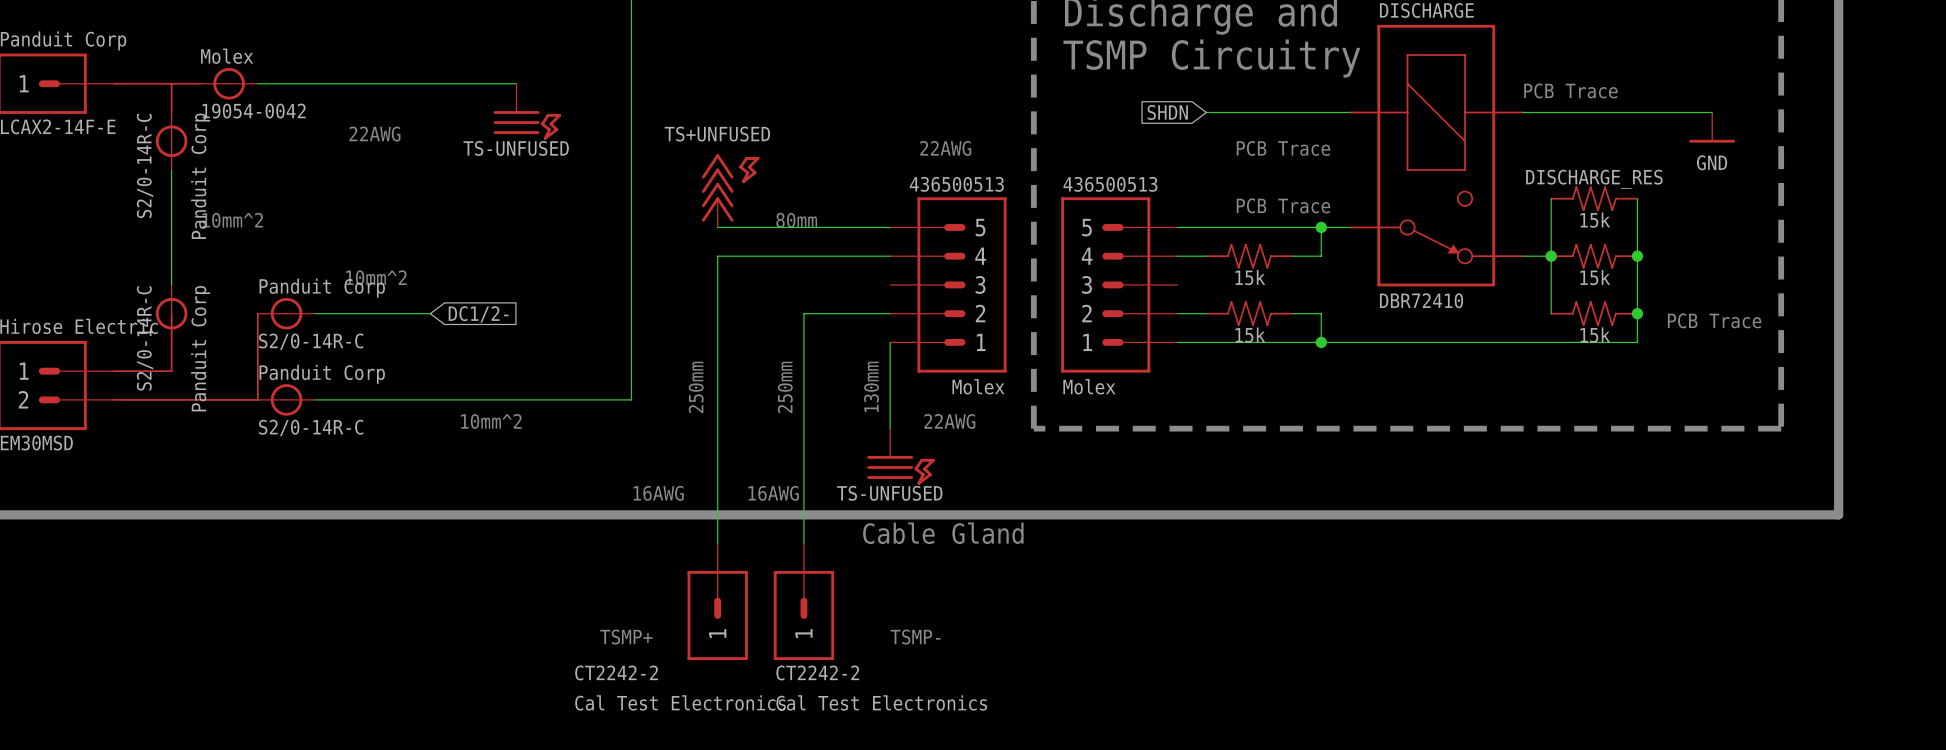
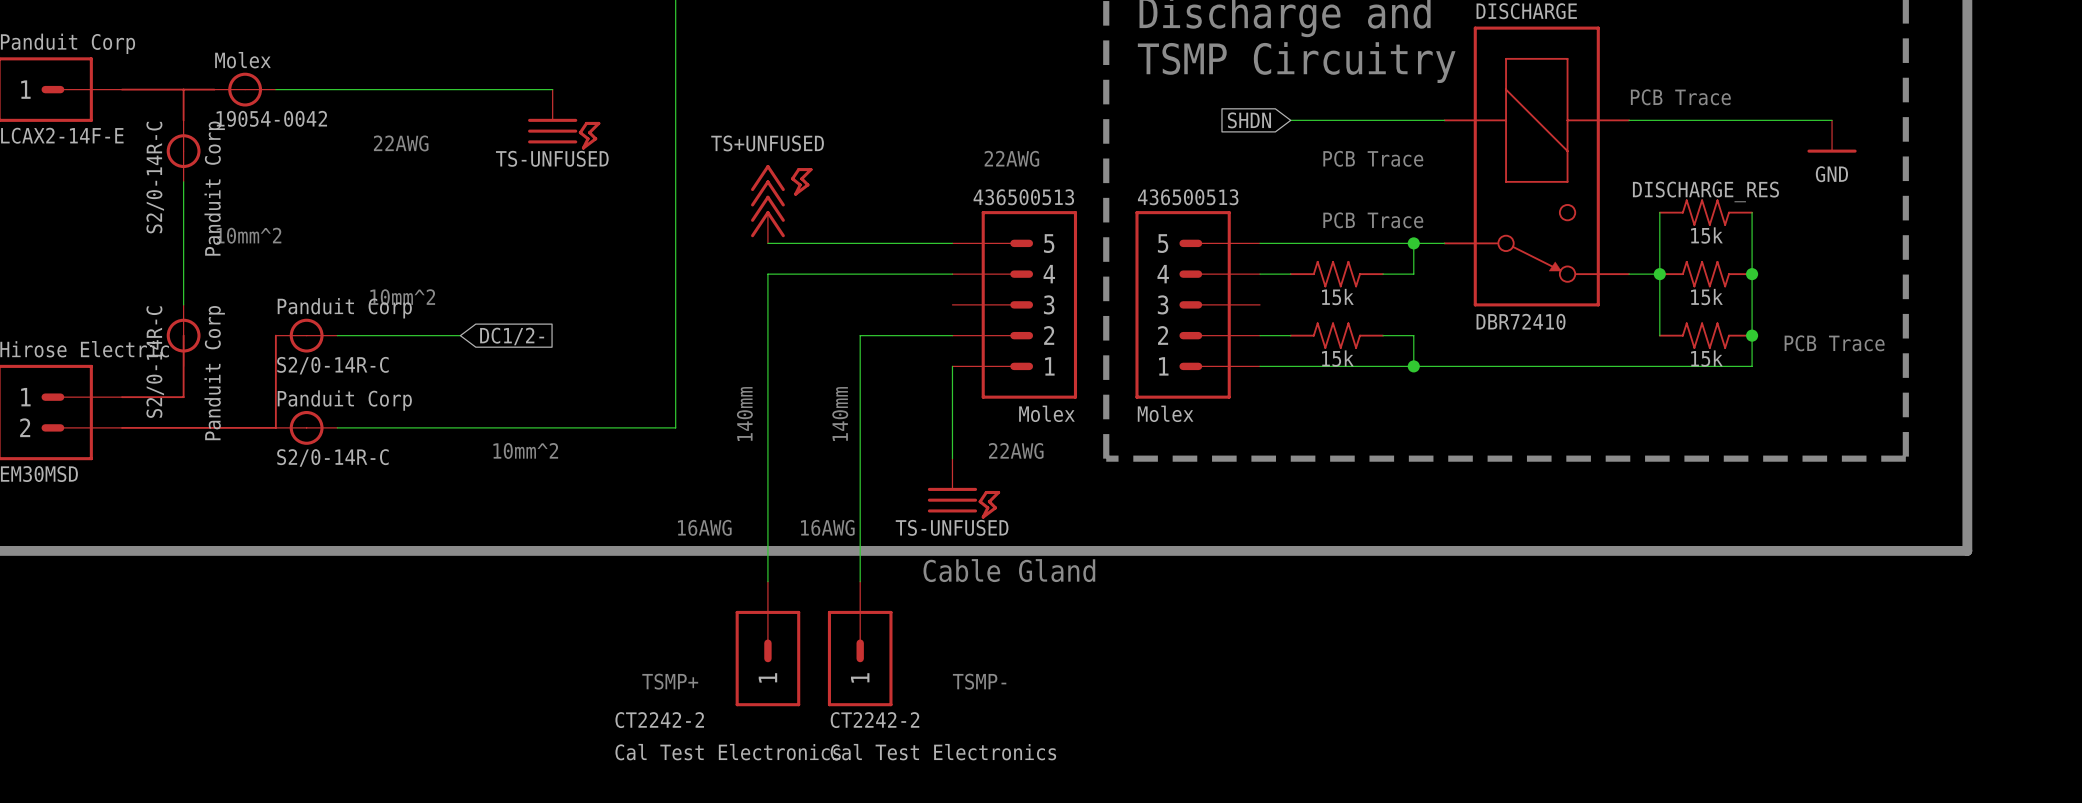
text: 80mm (796, 220) -> none
text: 130mm (871, 386) -> none
text: 250mm (696, 387) -> 140mm (744, 414)
text: 250mm (785, 387) -> 140mm (840, 414)

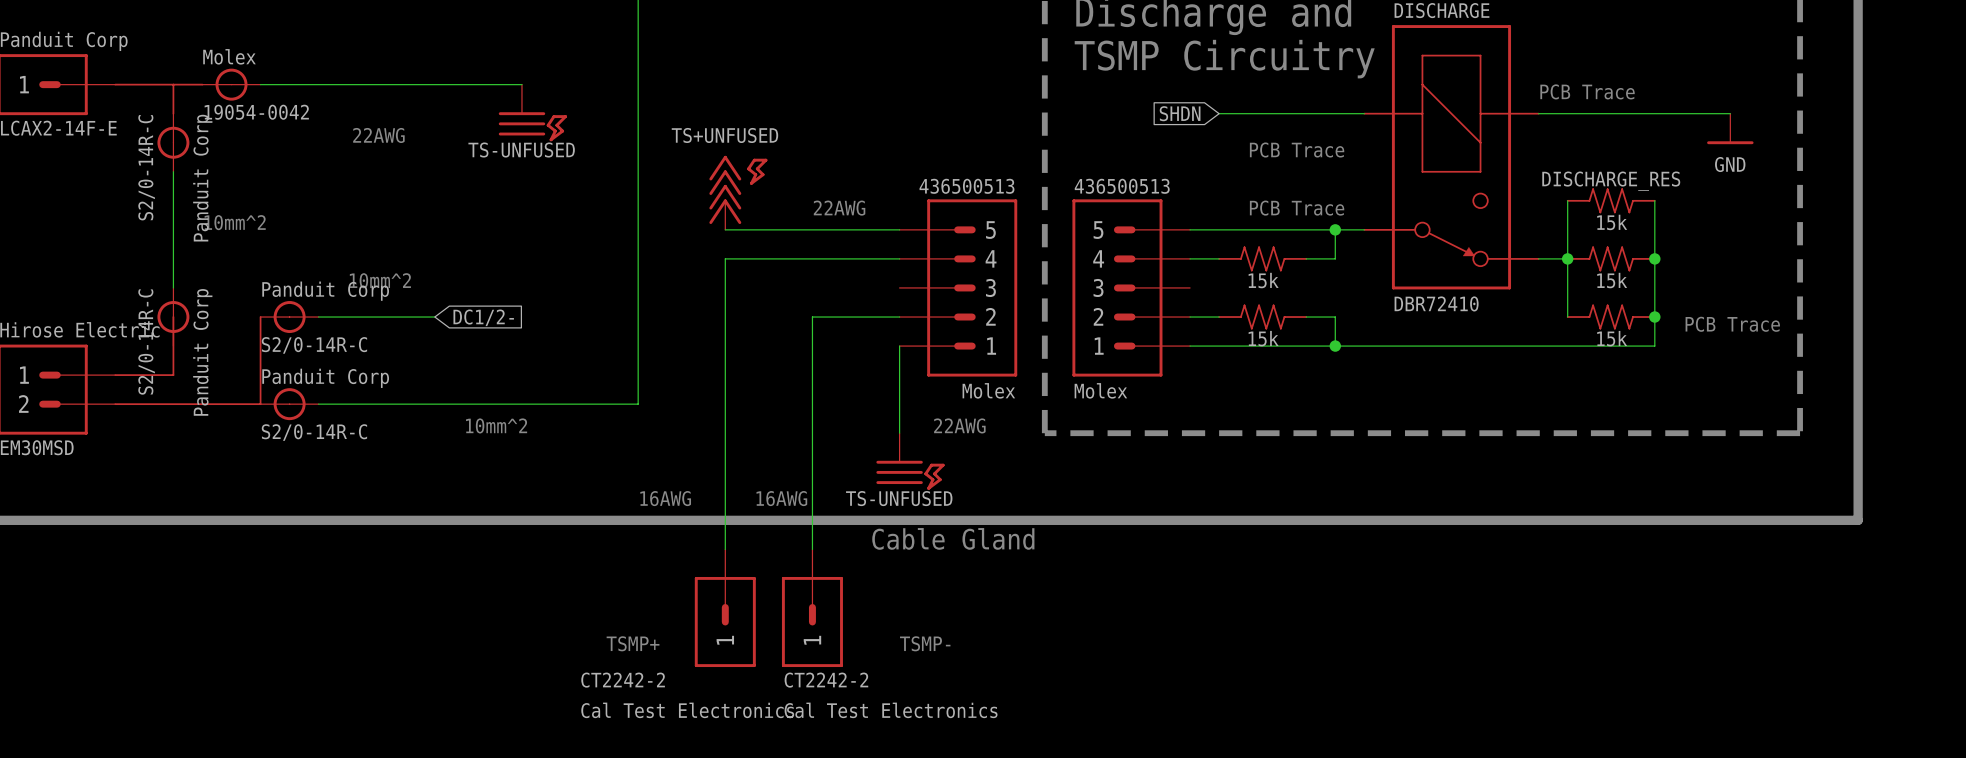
text position: 22AWG (1011, 158) -> 22AWG (839, 208)
text: 140mm (744, 414) -> none
text: 140mm (840, 414) -> none

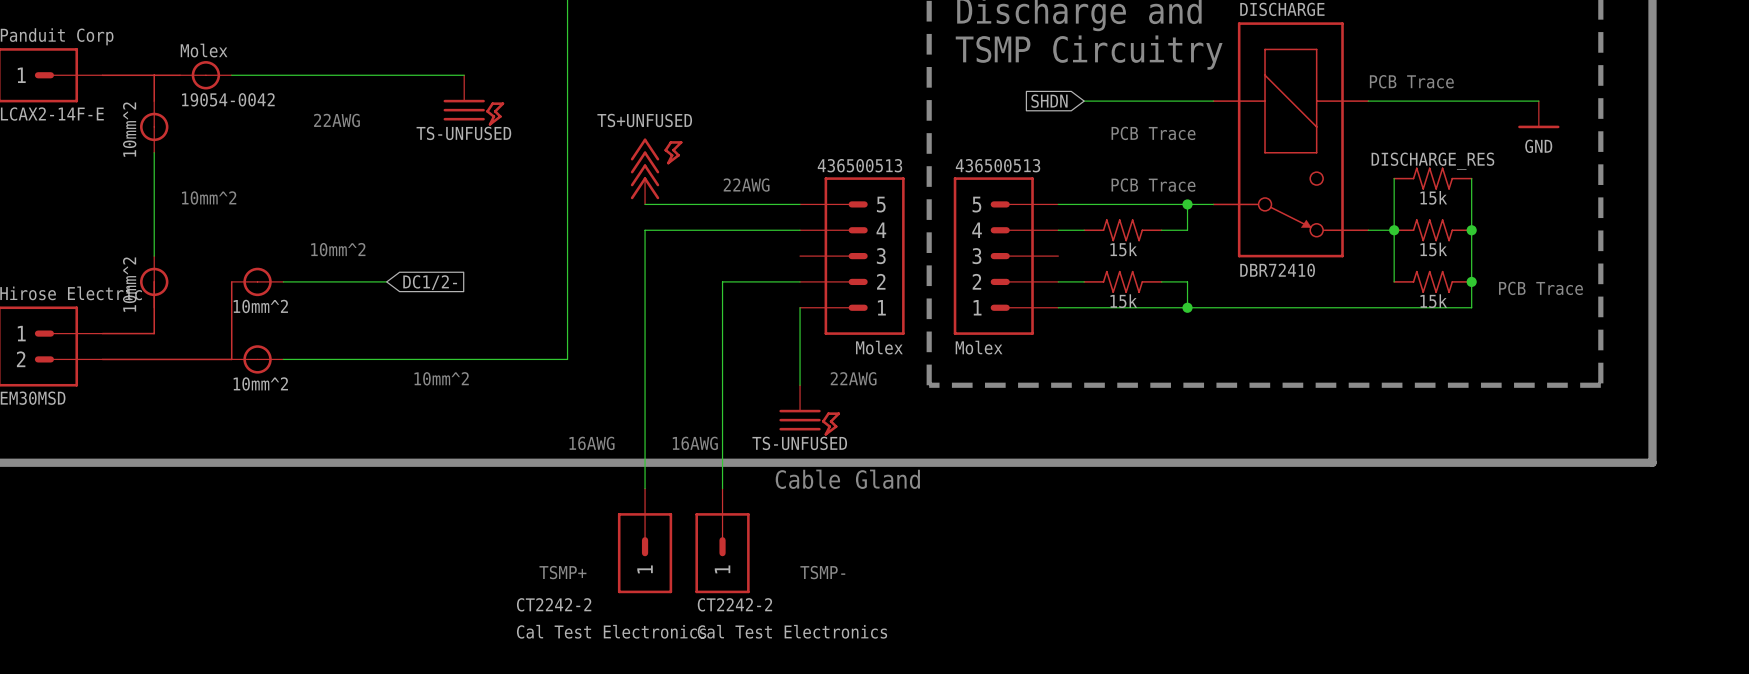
part text: S2/0-14R-C (146, 167) -> 10mm^2 (129, 129)
part text: Panduit Corp (202, 178) -> none
part text: Panduit Corp (325, 291) -> none
part text: S2/0-14R-C (146, 342) -> 10mm^2 (129, 284)
part text: S2/0-14R-C (314, 345) -> 10mm^2 (260, 306)
part text: Panduit Corp (202, 352) -> none
part text: Panduit Corp (325, 378) -> none
part text: S2/0-14R-C (314, 432) -> 10mm^2 (260, 383)

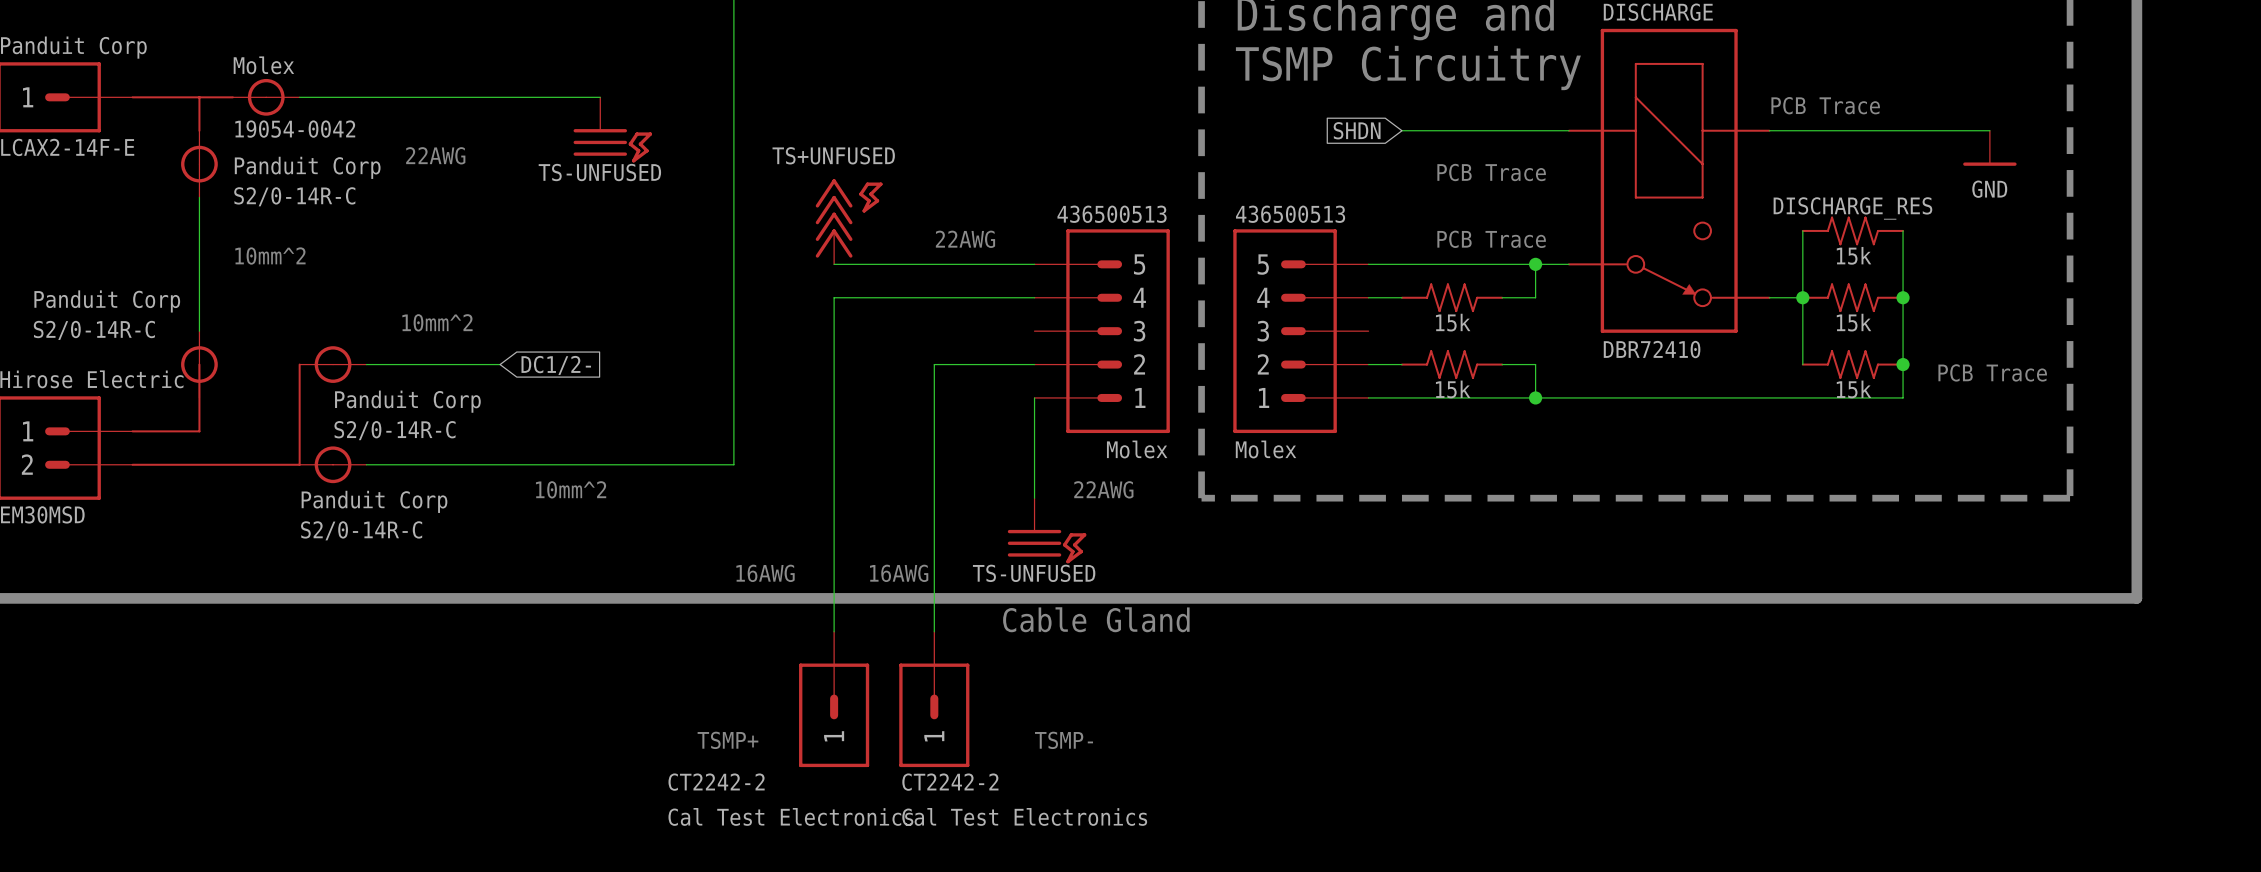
part text: 10mm^2 (129, 129) -> S2/0-14R-C (294, 196)
part text: none -> Panduit Corp (307, 167)
part text: none -> Panduit Corp (107, 301)
part text: 10mm^2 (129, 284) -> S2/0-14R-C (94, 330)
part text: 10mm^2 (260, 306) -> S2/0-14R-C (395, 430)
part text: none -> Panduit Corp (407, 401)
part text: 10mm^2 (260, 383) -> S2/0-14R-C (361, 530)
part text: none -> Panduit Corp (374, 501)

